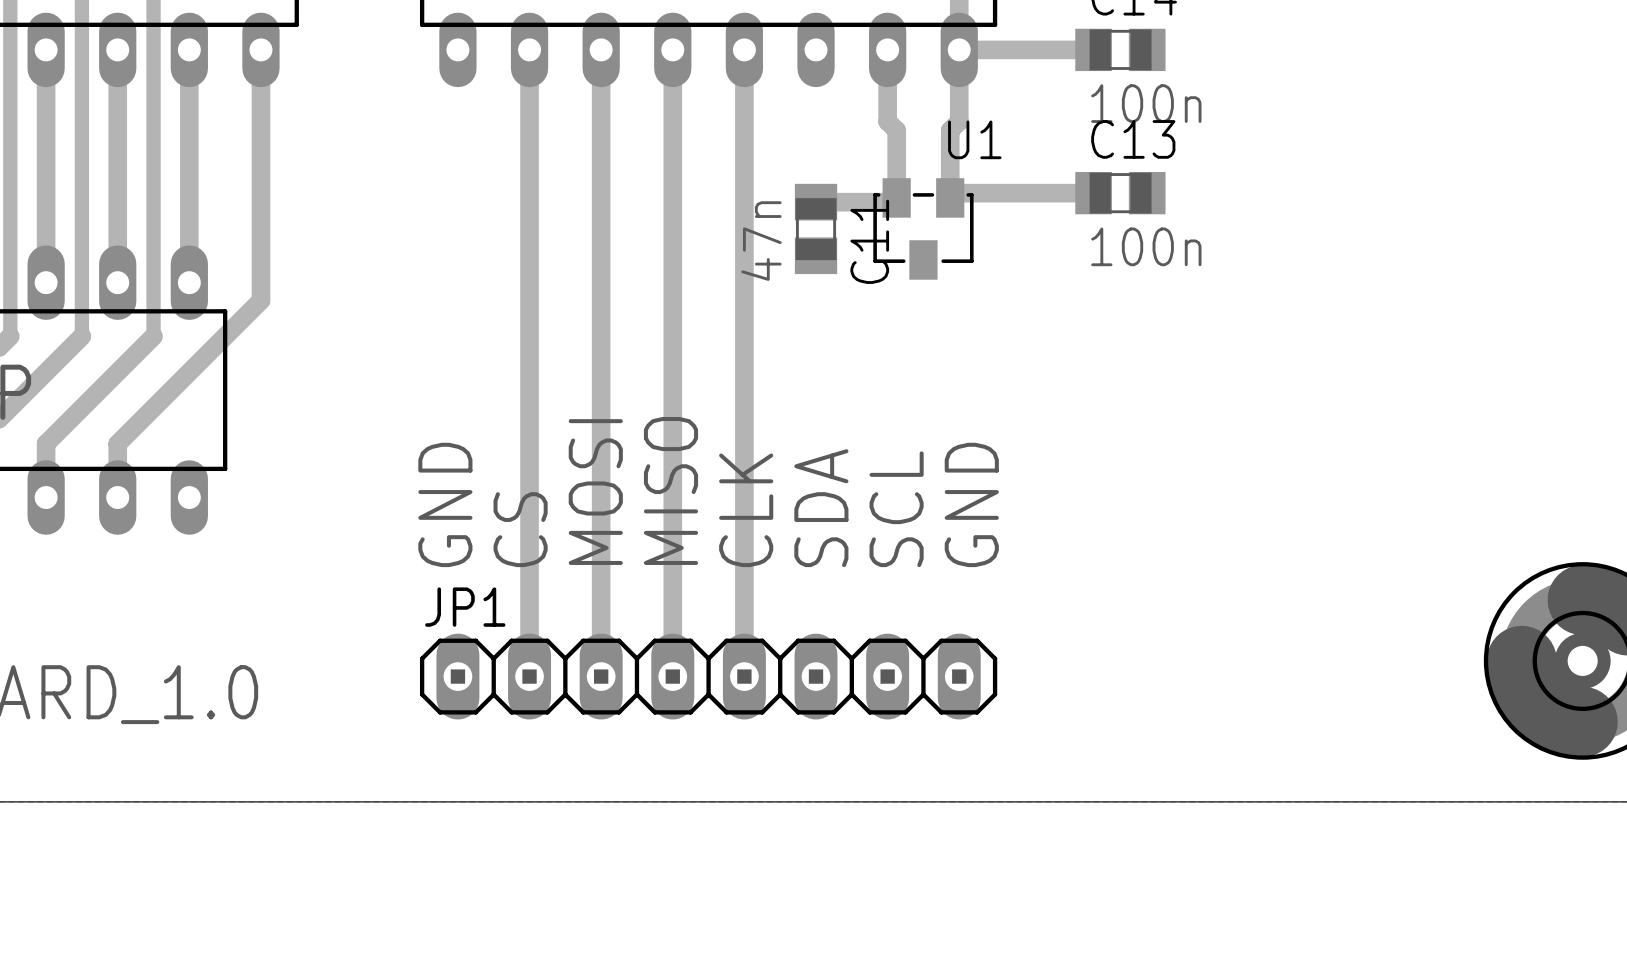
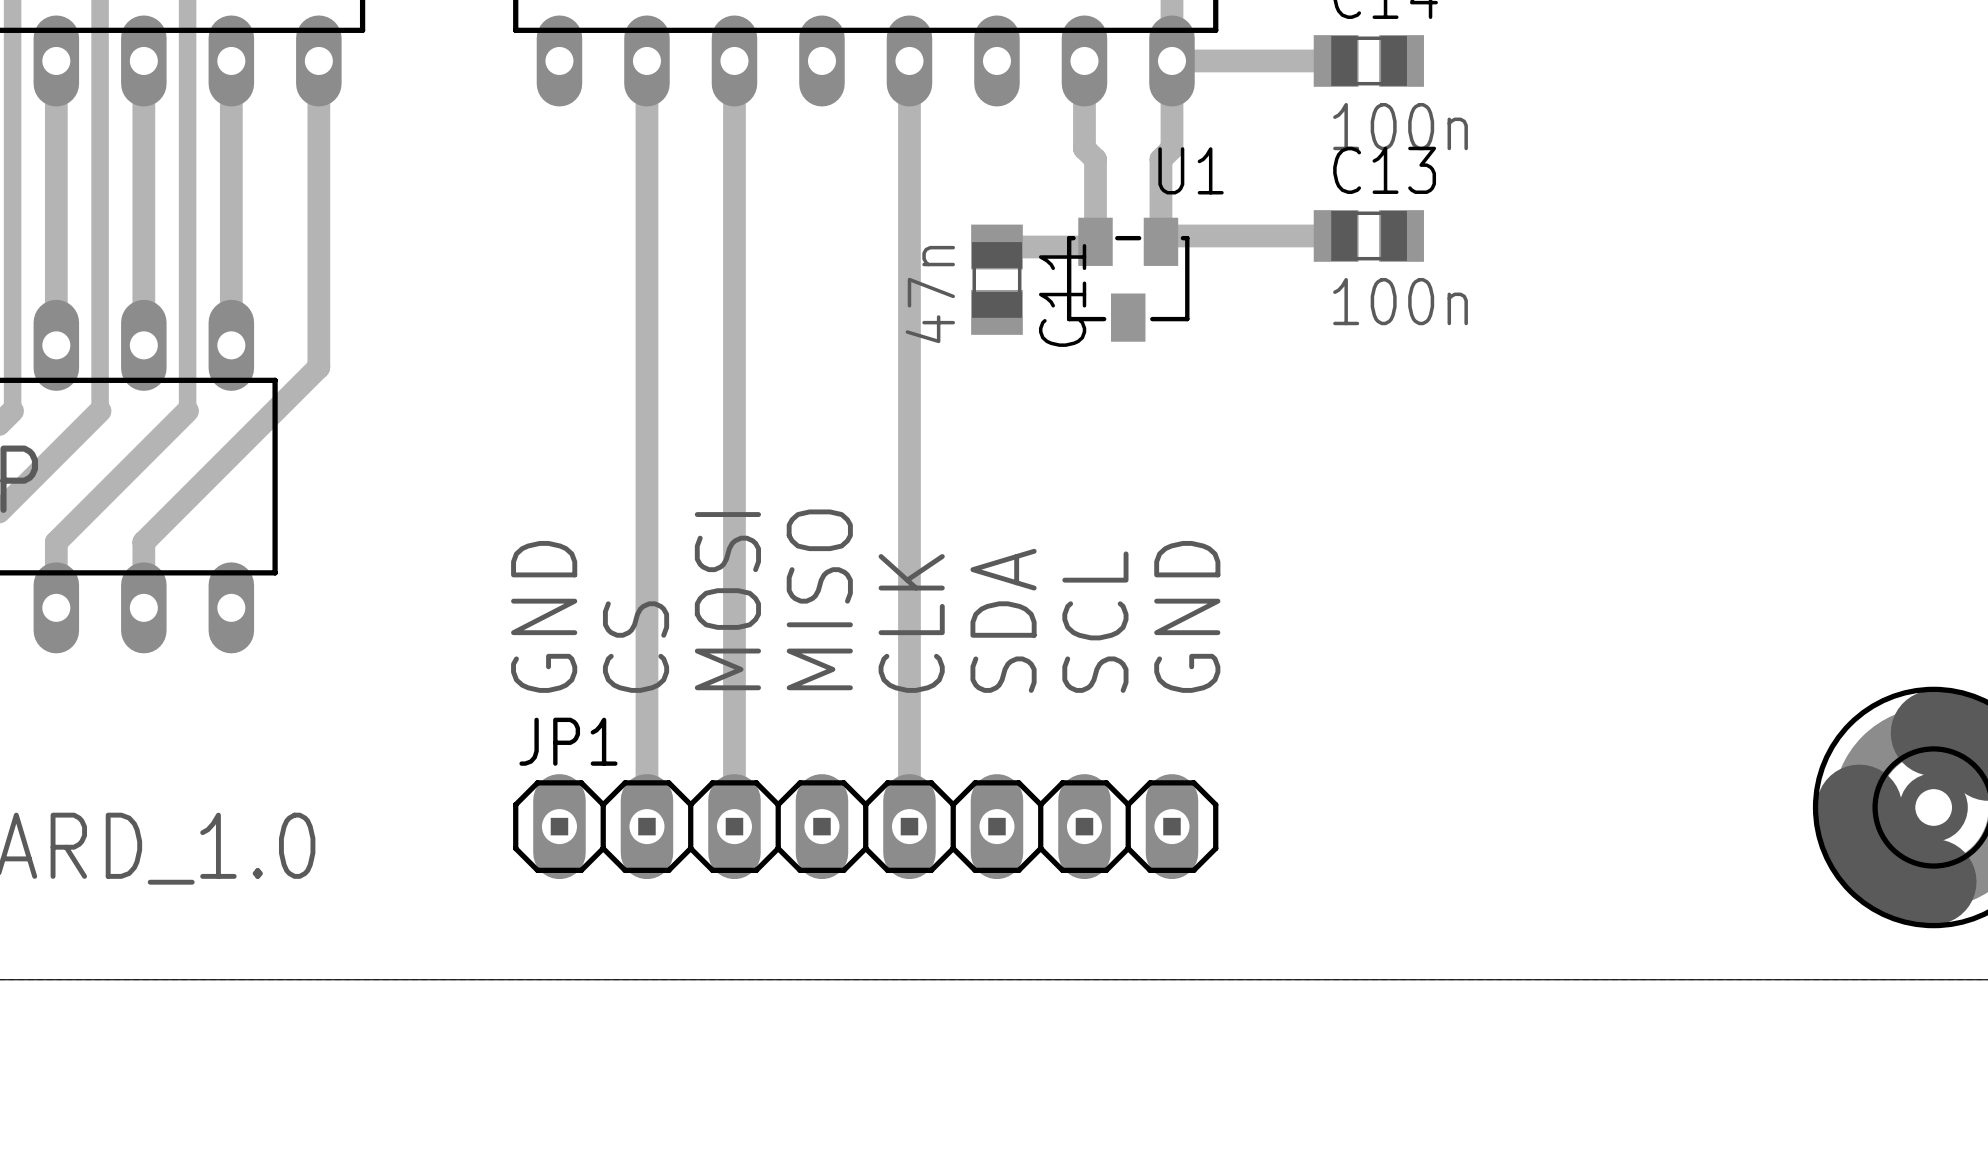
track: (672, 49) (672, 676) -> none

